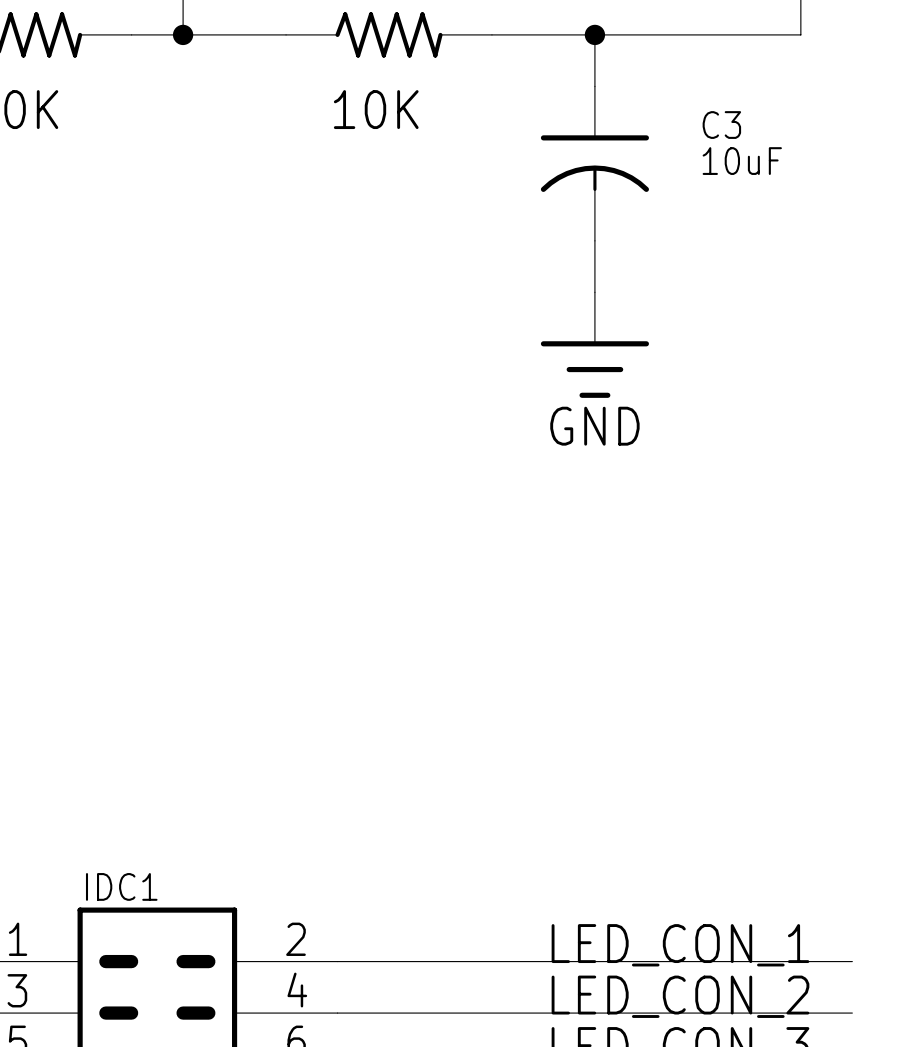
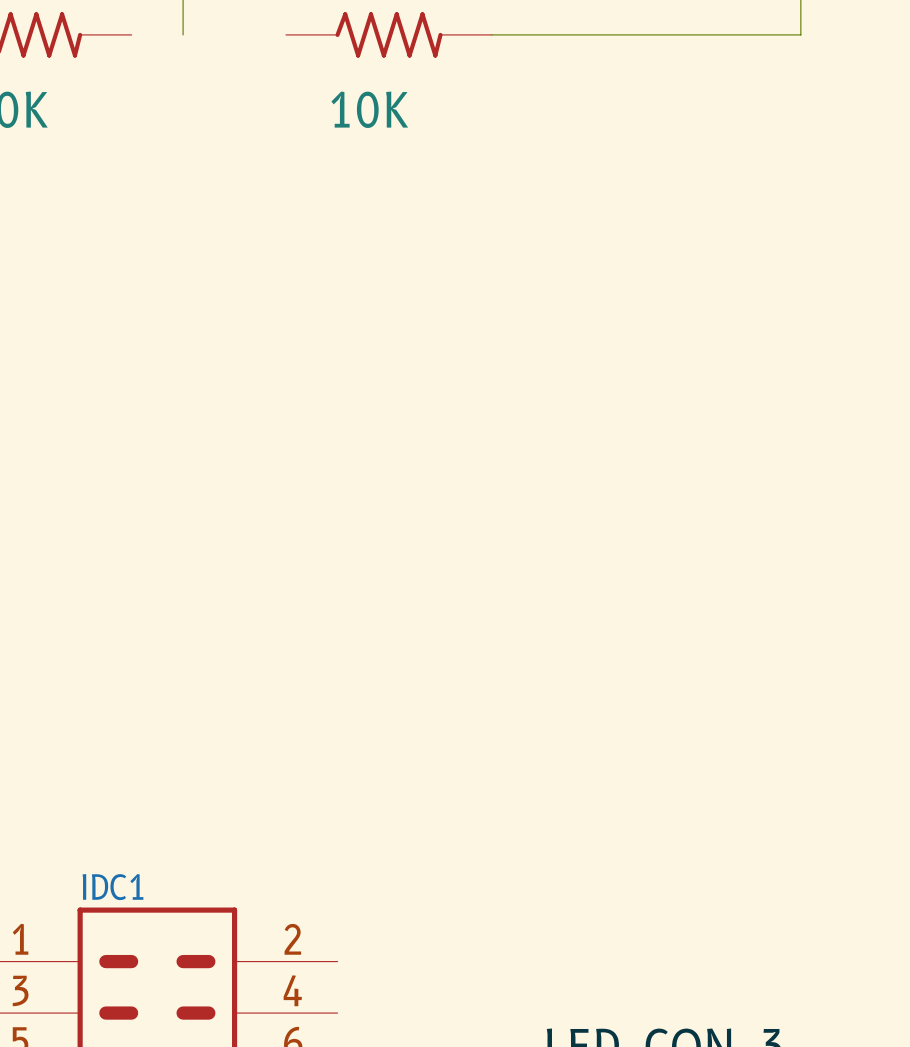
wire: (131, 34) (286, 34) -> none
junction: (183, 34) -> none
wire: (594, 34) (594, 86) -> none
junction: (594, 34) -> none
C3: 10uF (594, 163) -> none
wire: (594, 240) (594, 292) -> none
power symbol: GND (594, 345) -> none
label: LED_CON_1 (680, 945) -> none
wire: (337, 961) (852, 961) -> none
label: LED_CON_2 (680, 996) -> none
wire: (337, 1013) (852, 1013) -> none

